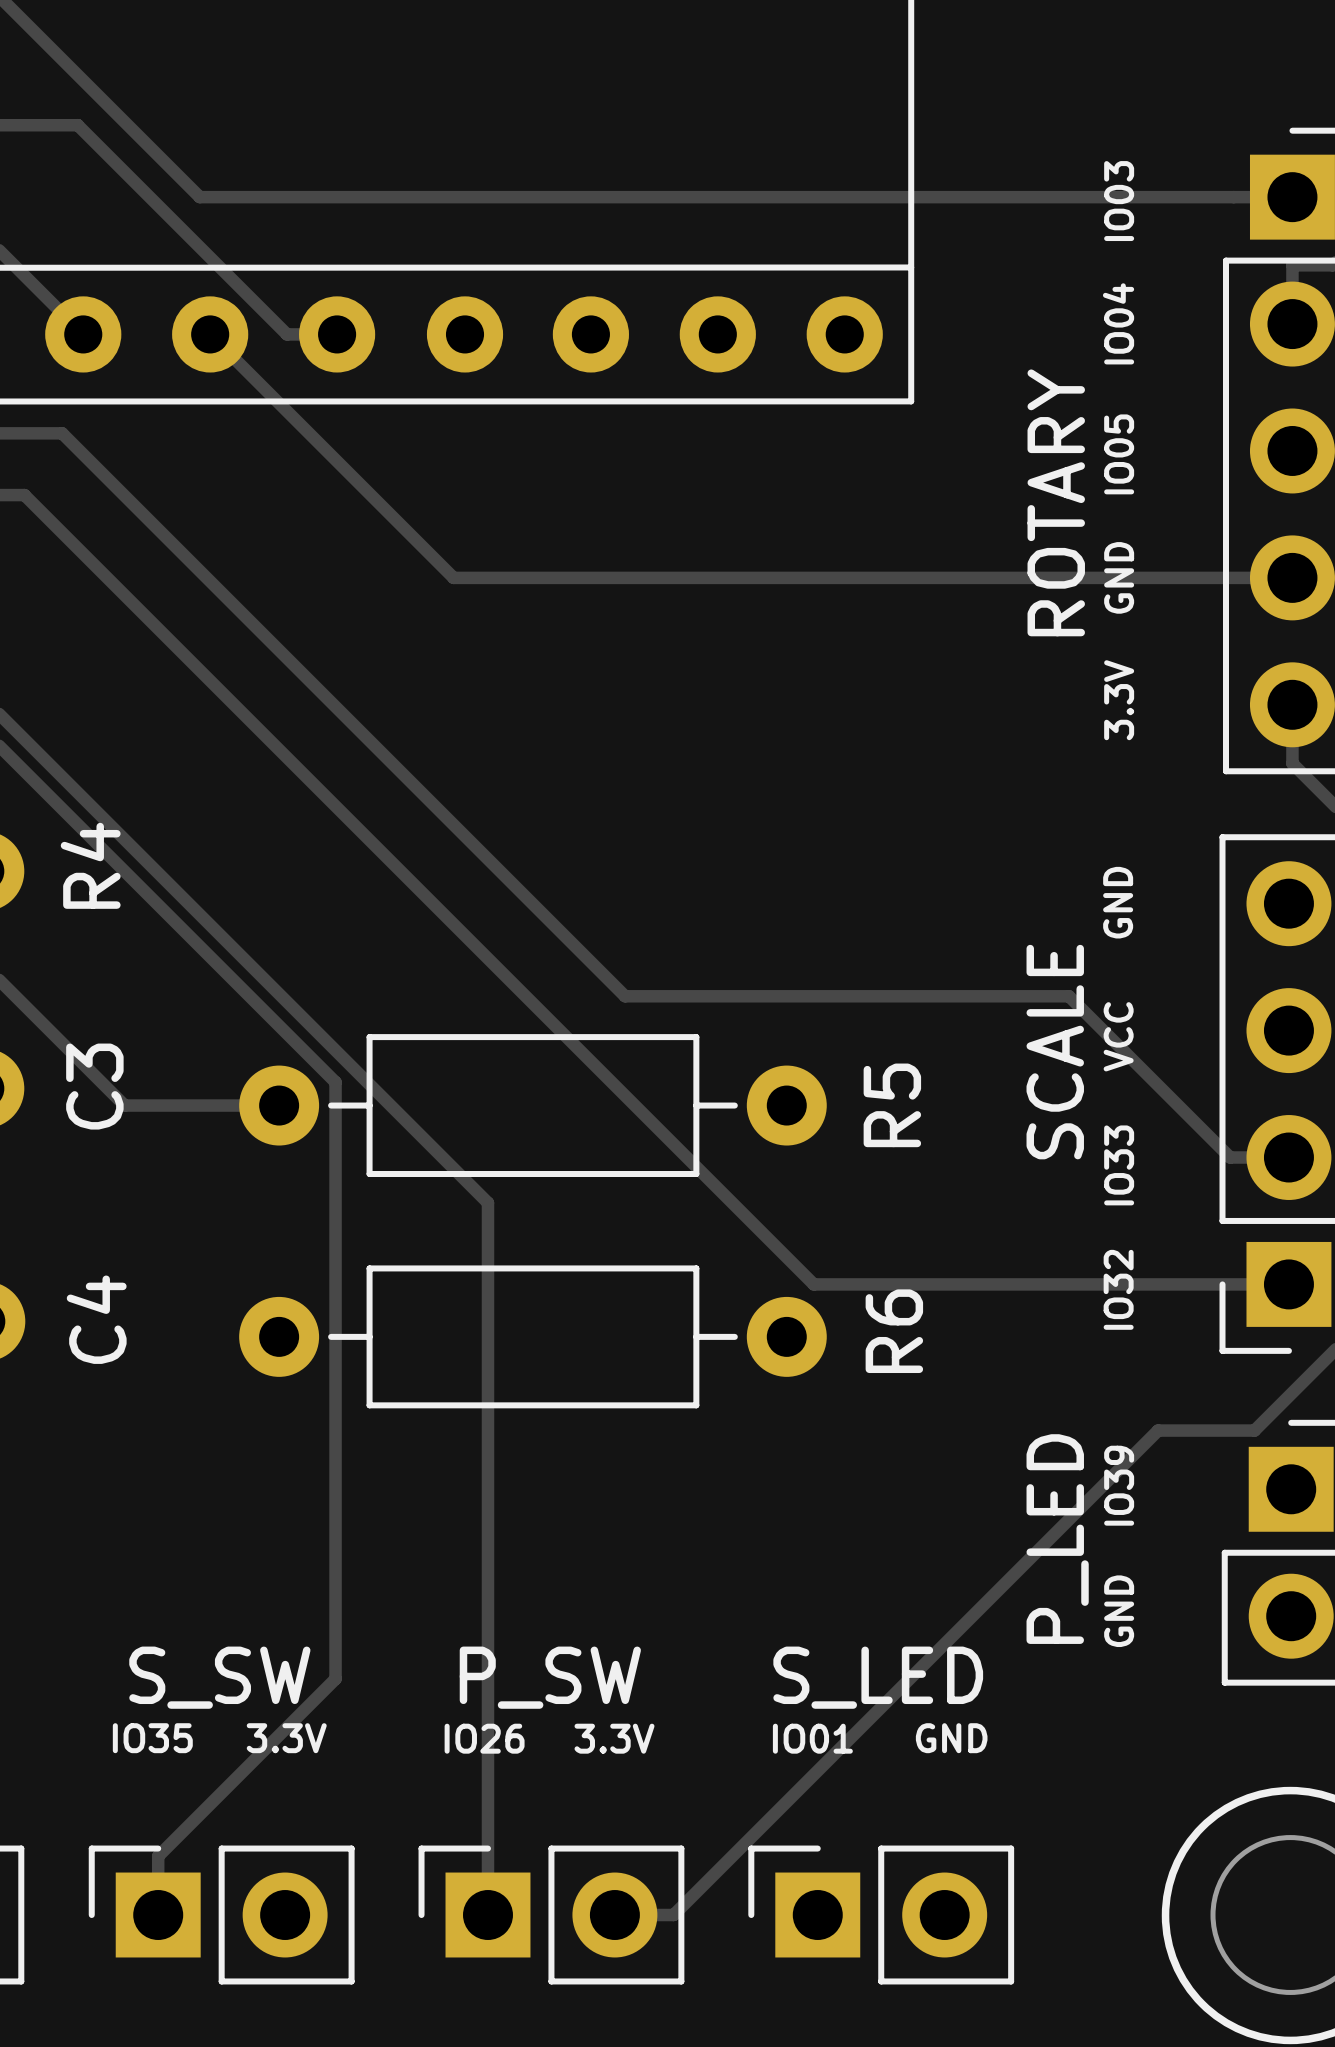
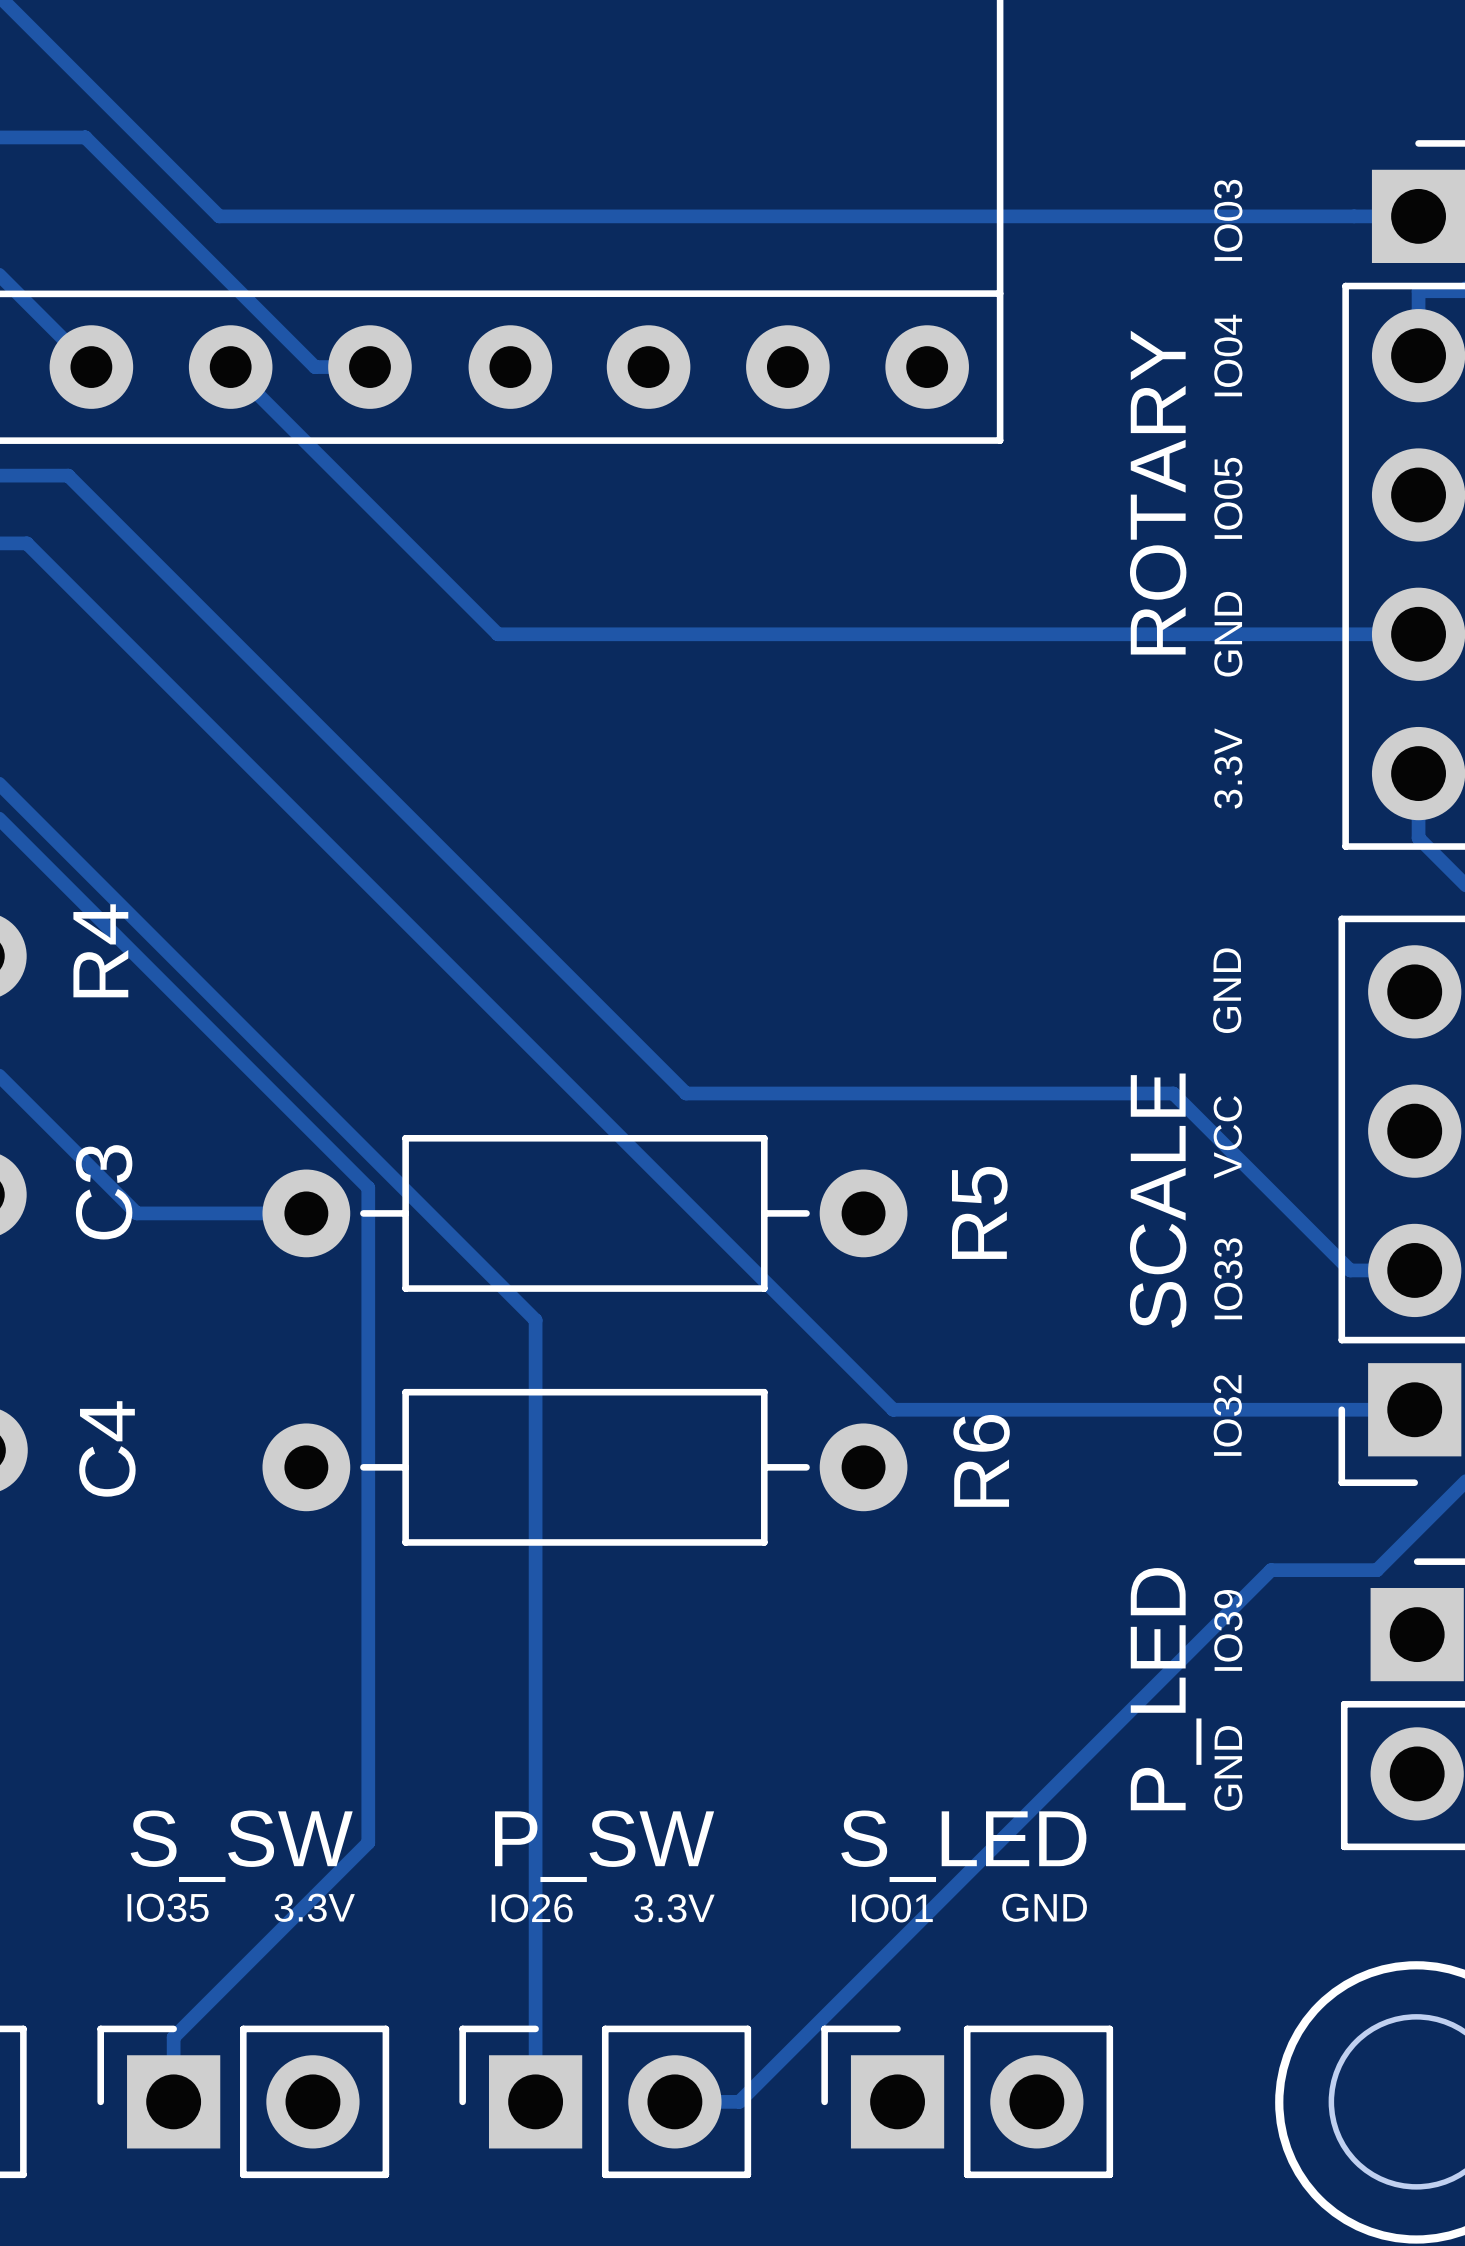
ROTARY name position: ROTARY (1056, 502) -> ROTARY (1158, 492)
SCALE name position: SCALE (1055, 1052) -> SCALE (1158, 1200)

